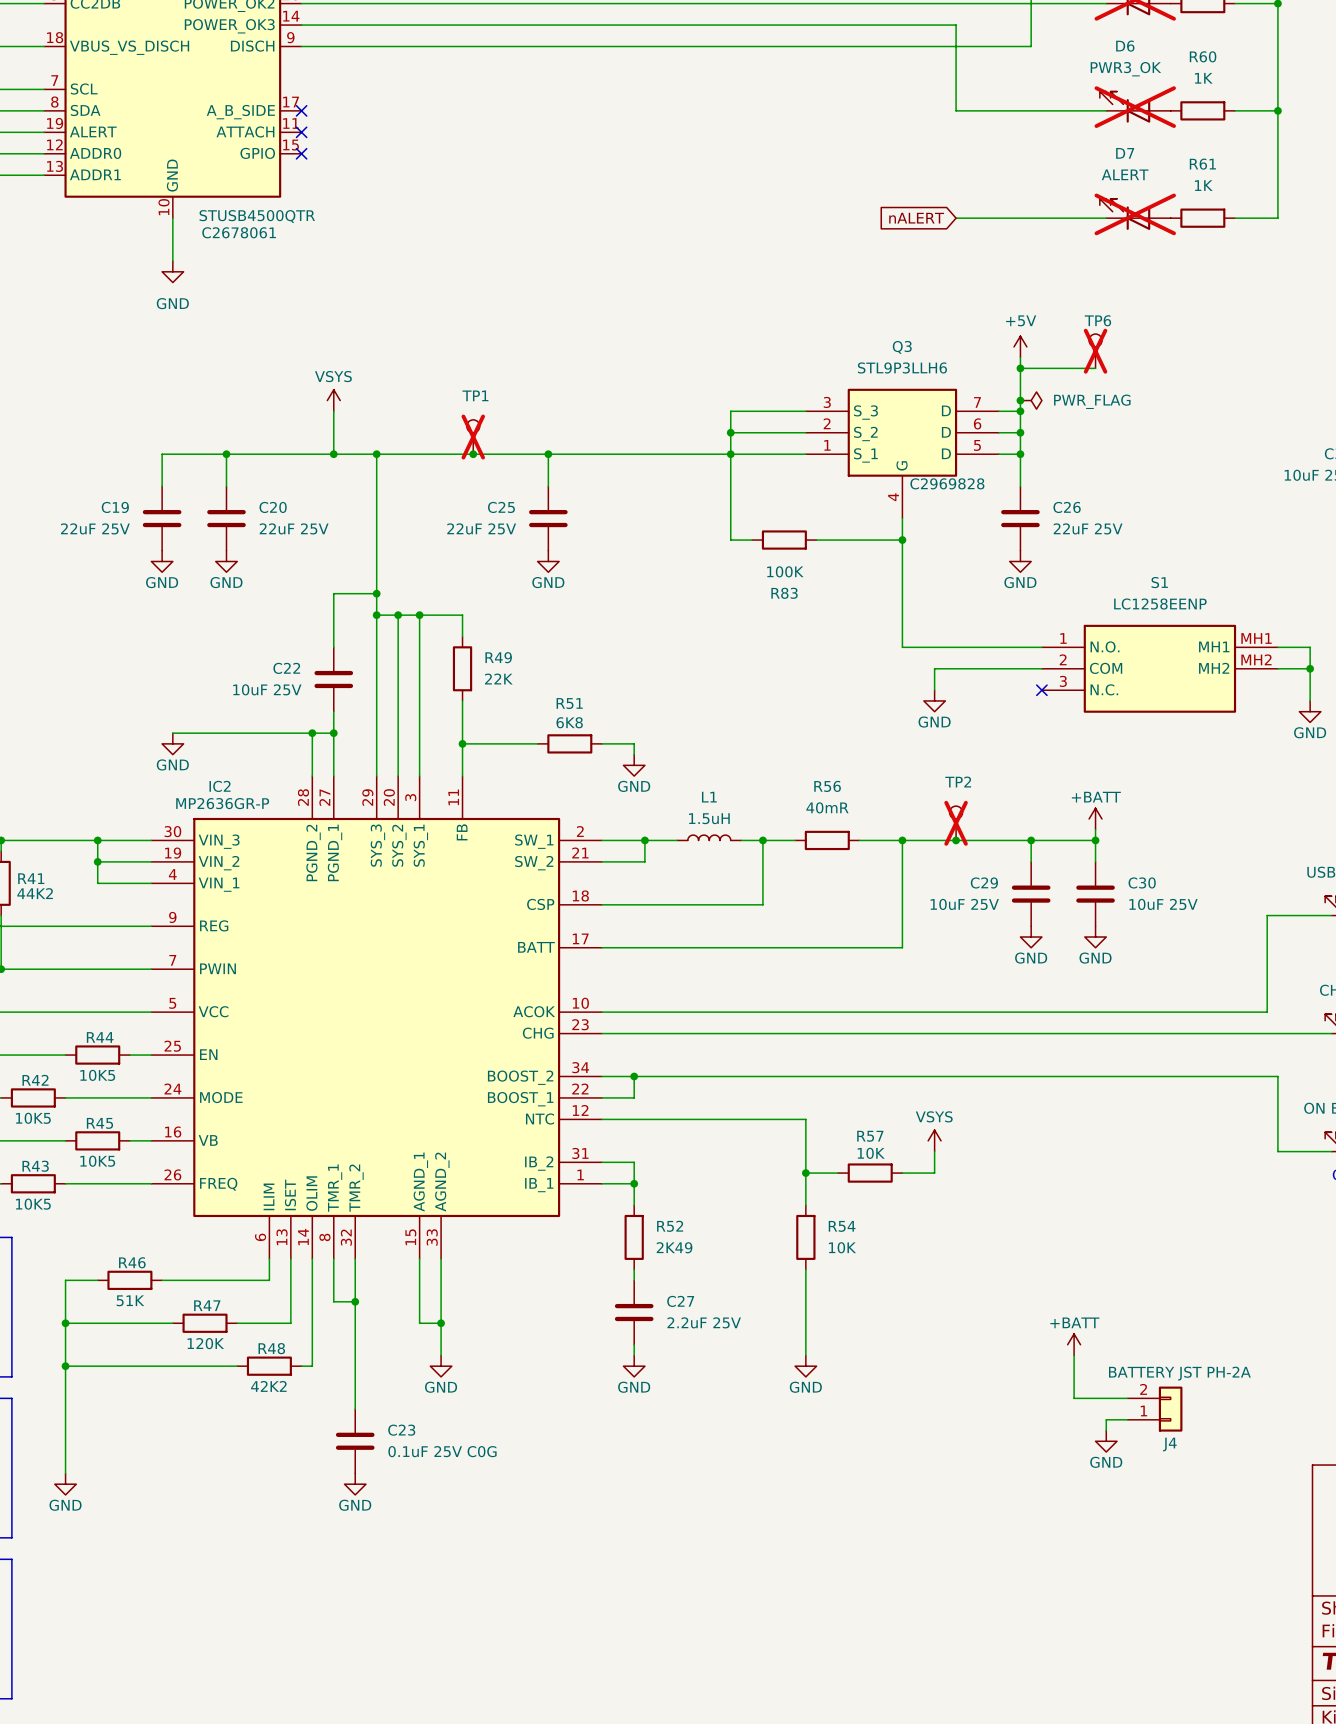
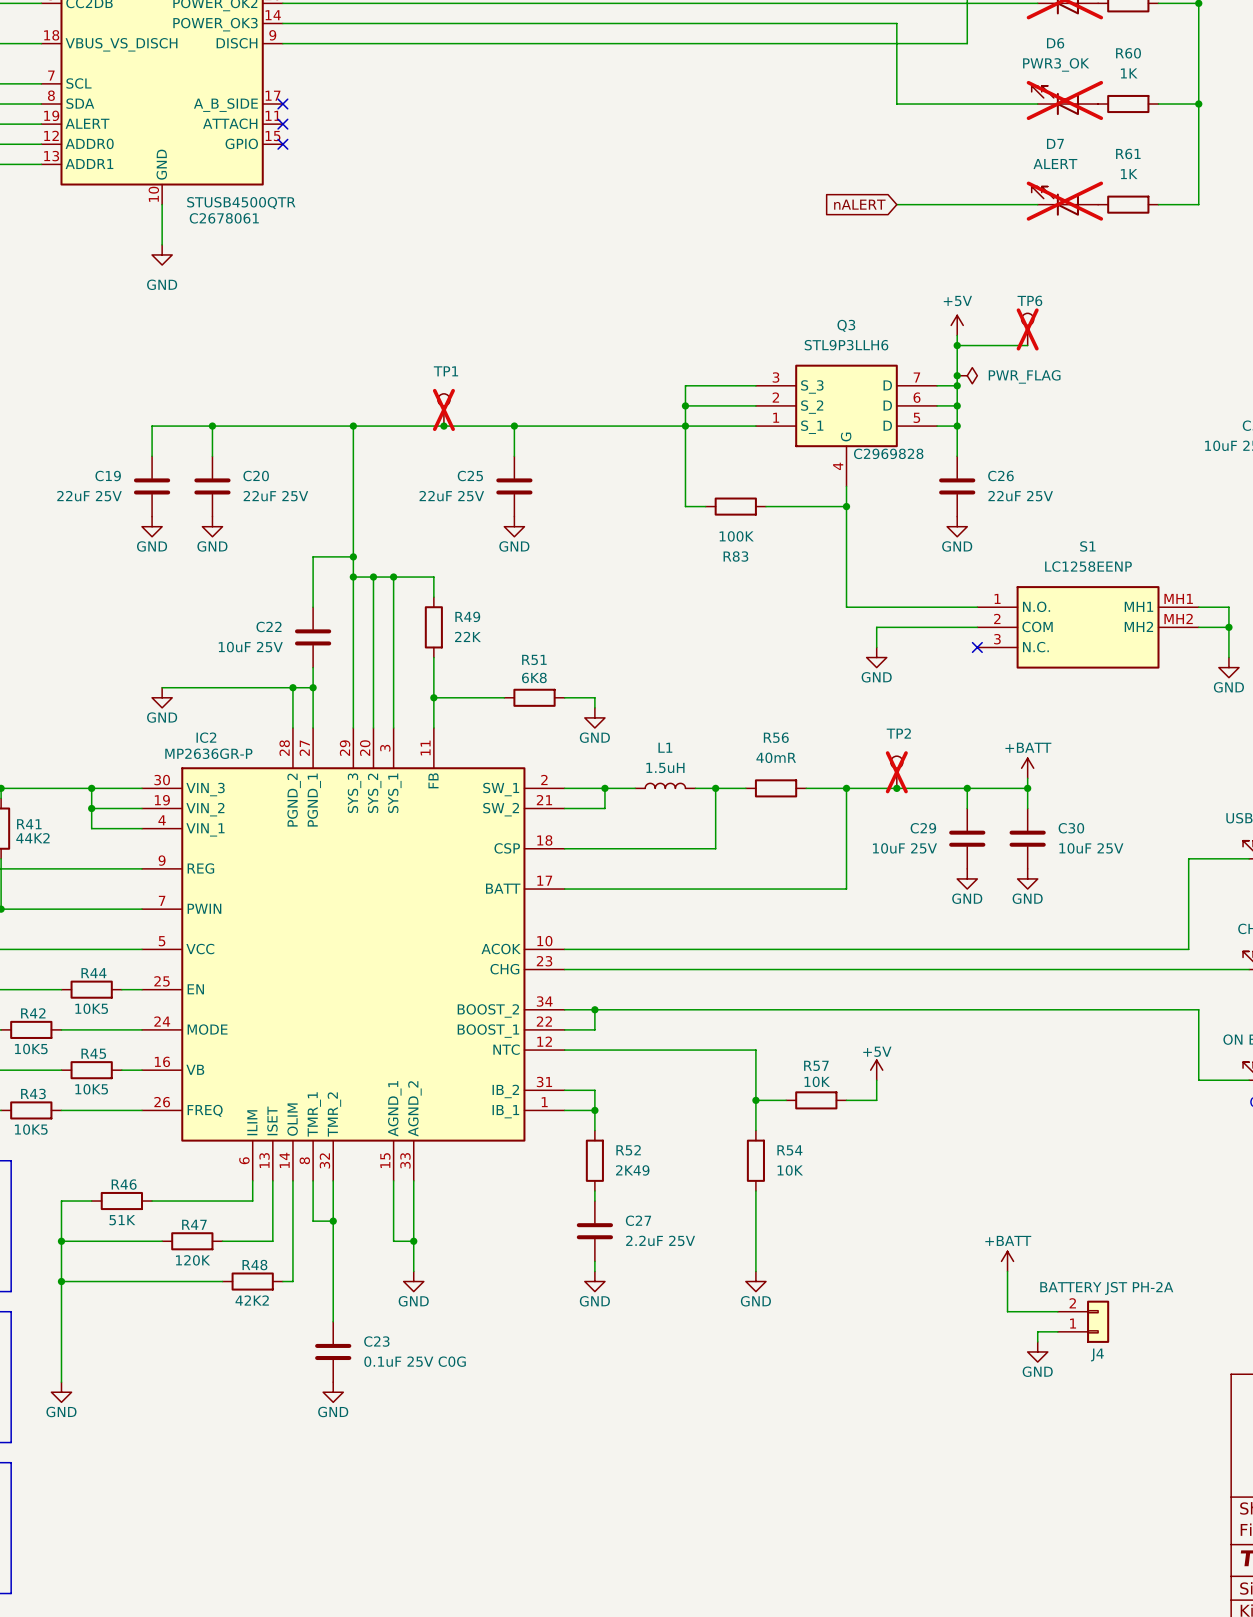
power symbol: VSYS (333, 400) -> none
wire: (333, 411) (333, 454) -> none
junction: (333, 454) -> none
power symbol: VSYS (934, 1140) -> +5V (876, 1070)

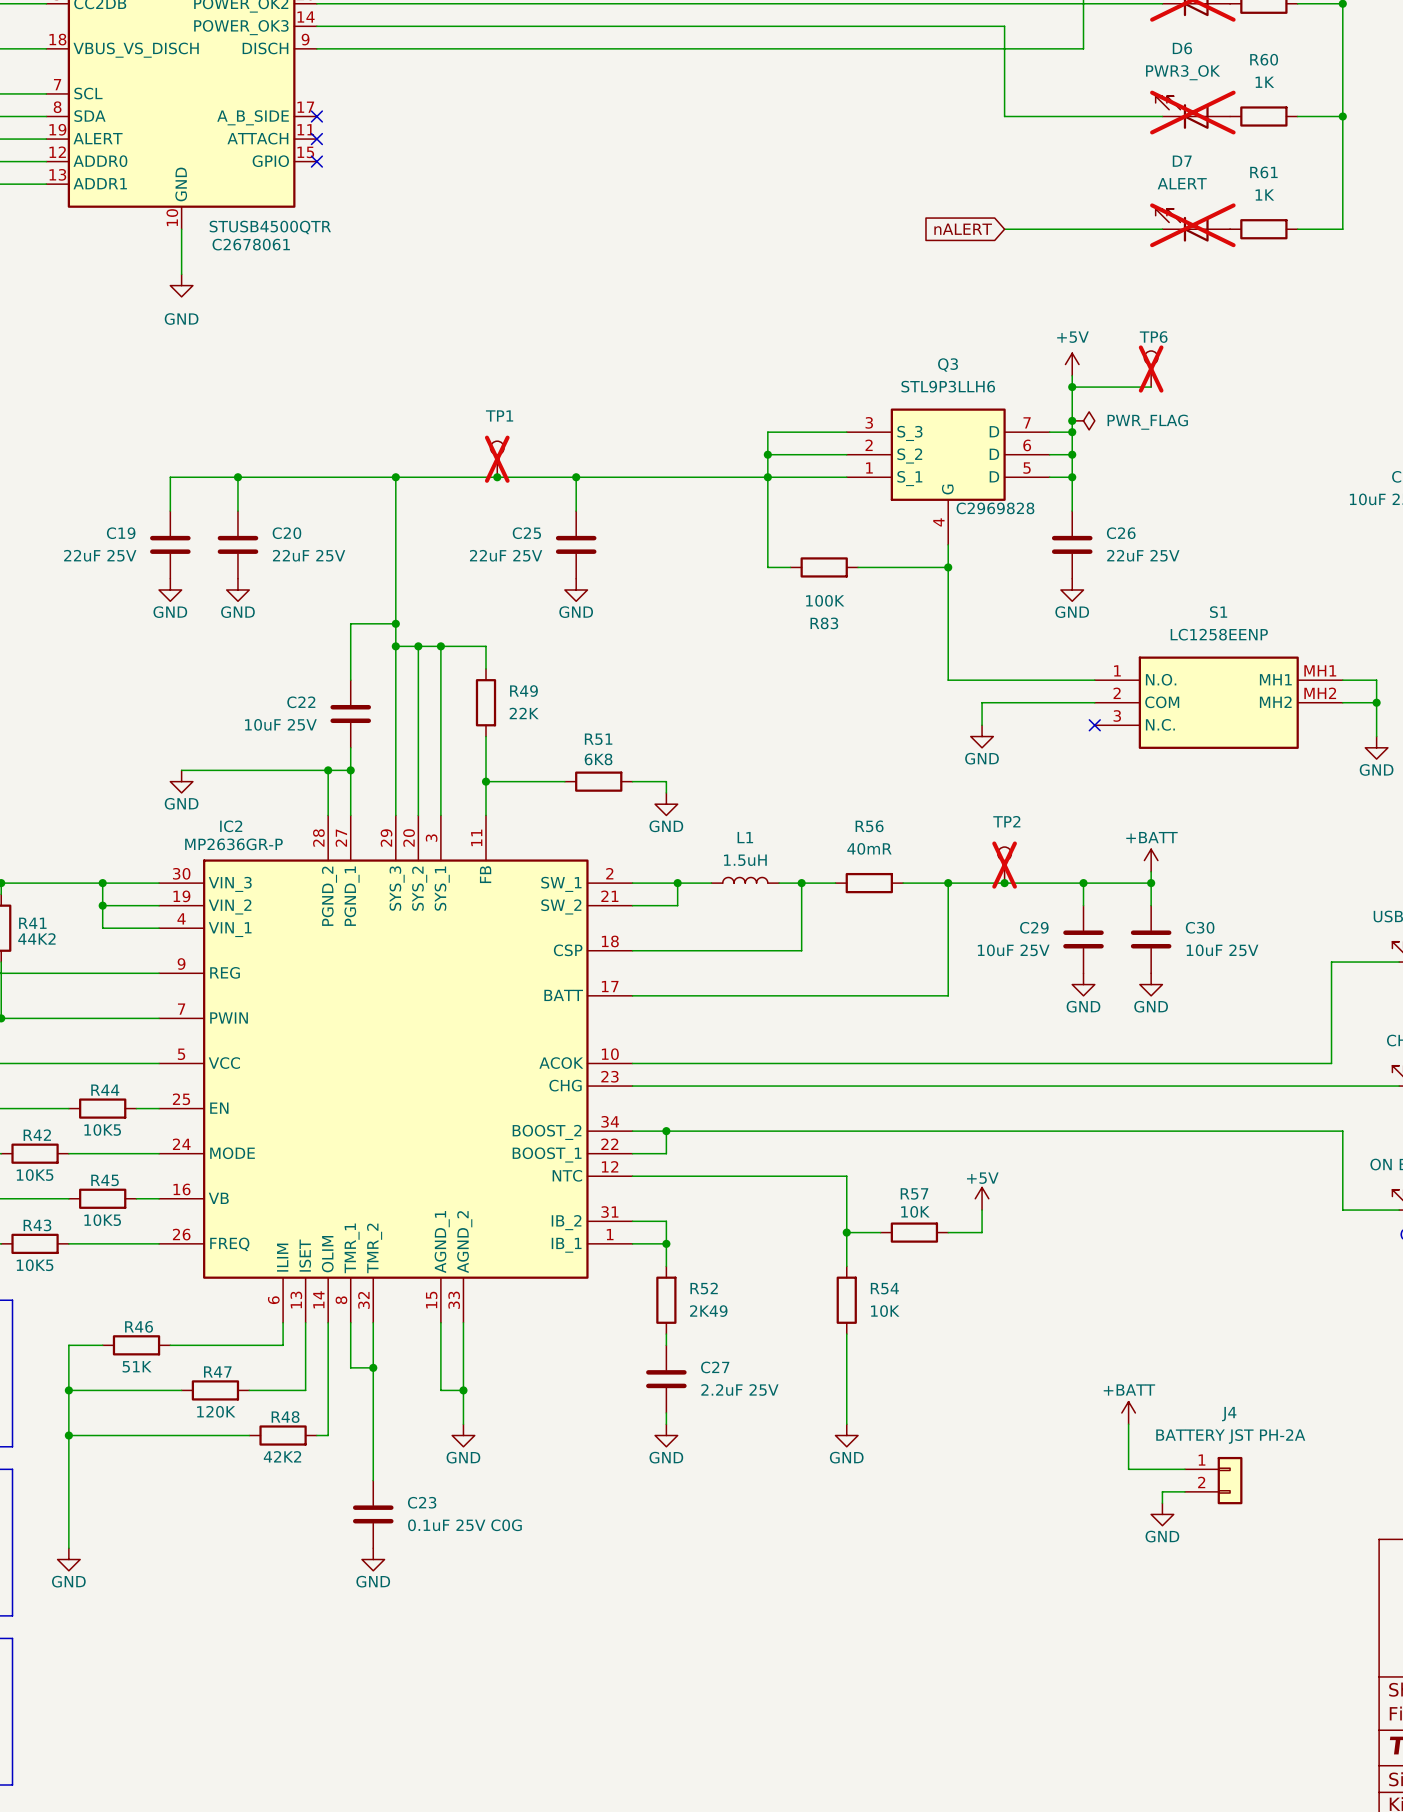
J4 flip: as is (1098, 1321) -> up-down (1230, 1480)
J4 name position: J4 (1097, 1354) -> J4 (1229, 1414)

